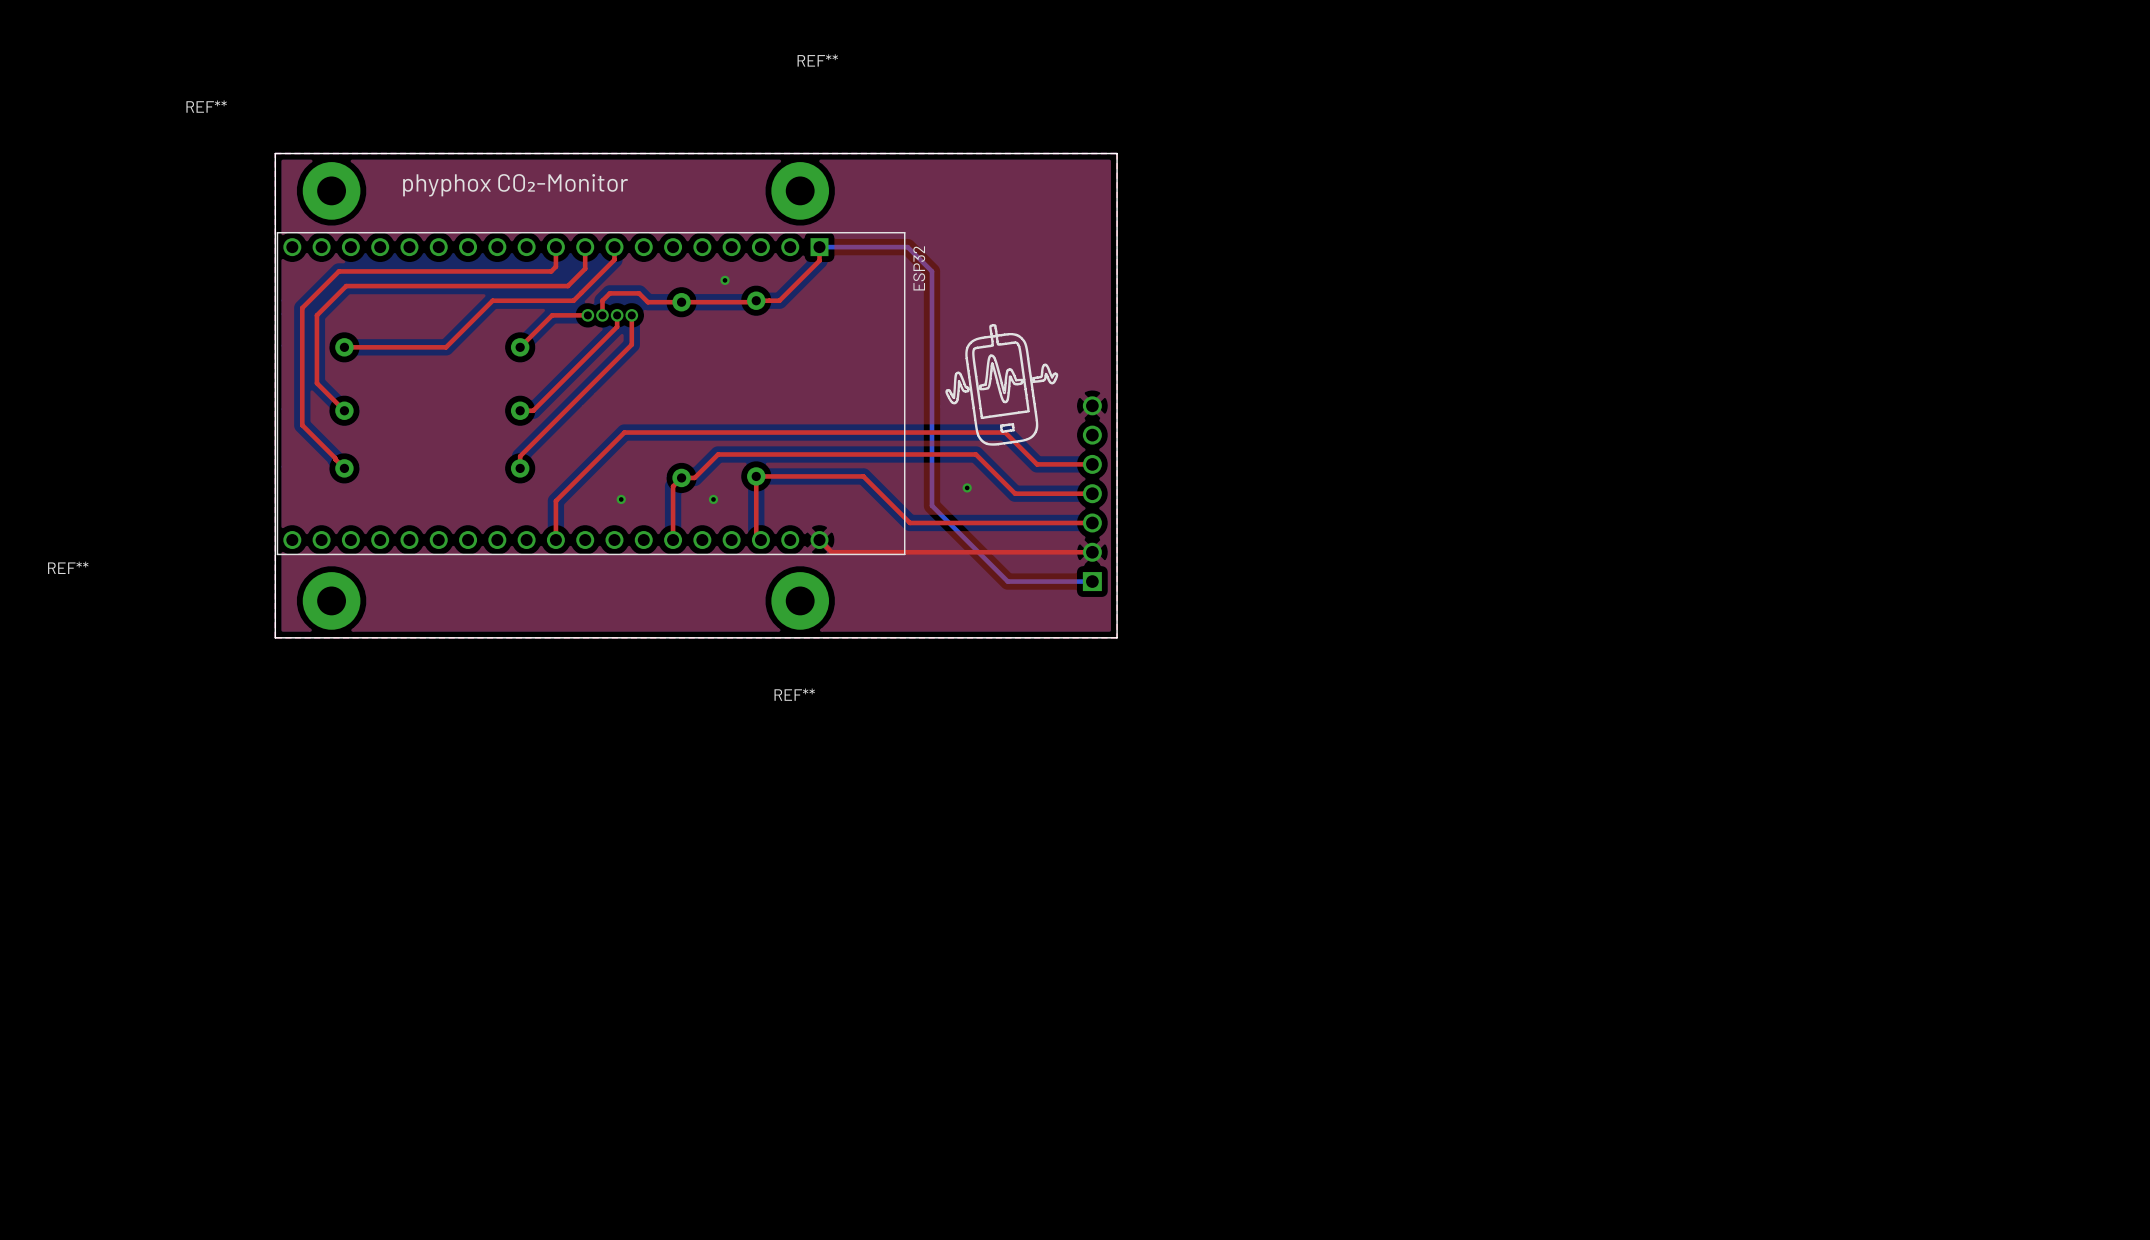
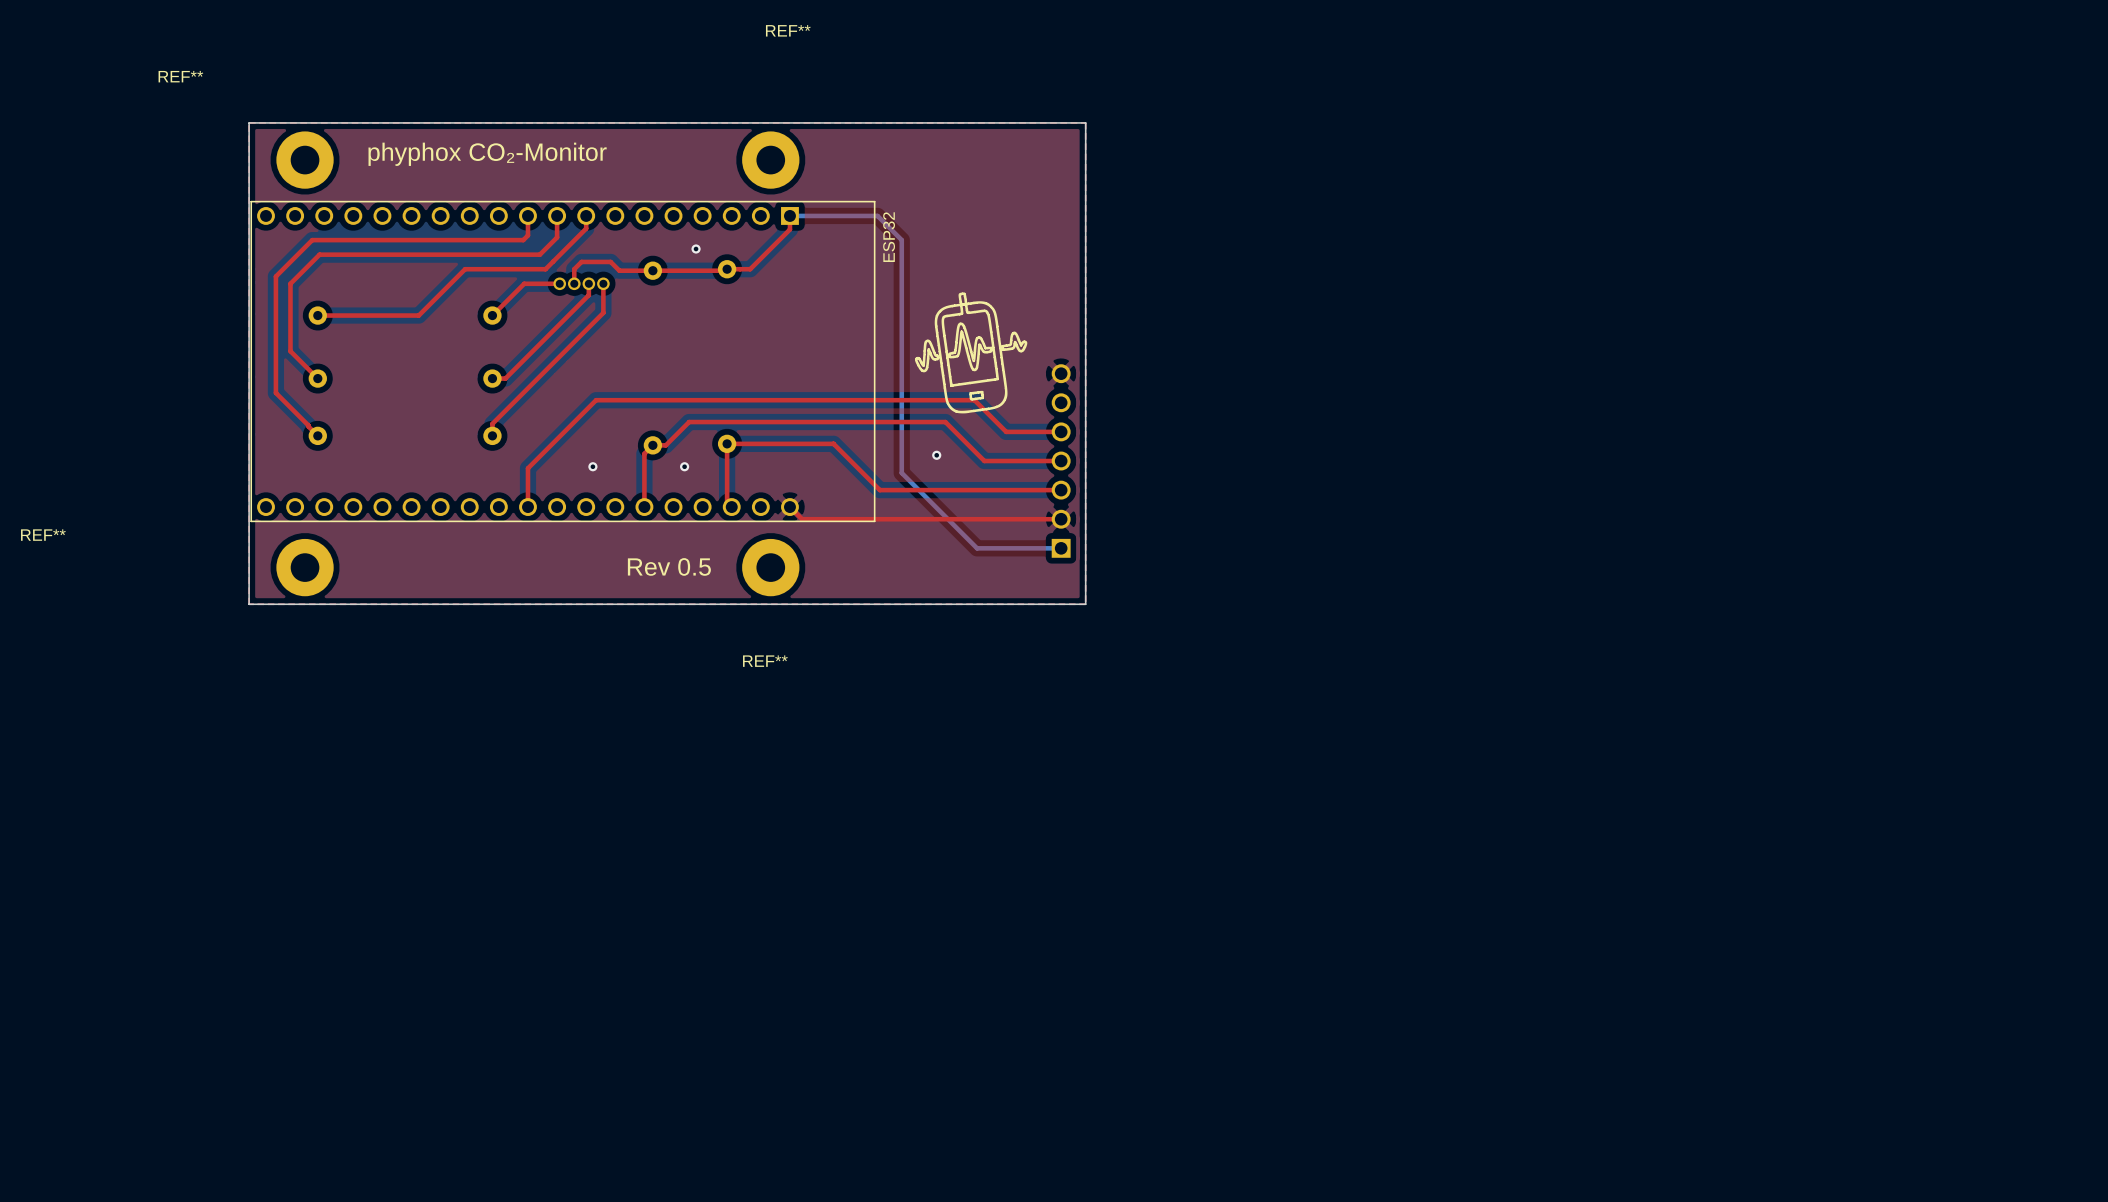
text: none -> Rev 0.5 (669, 566)

